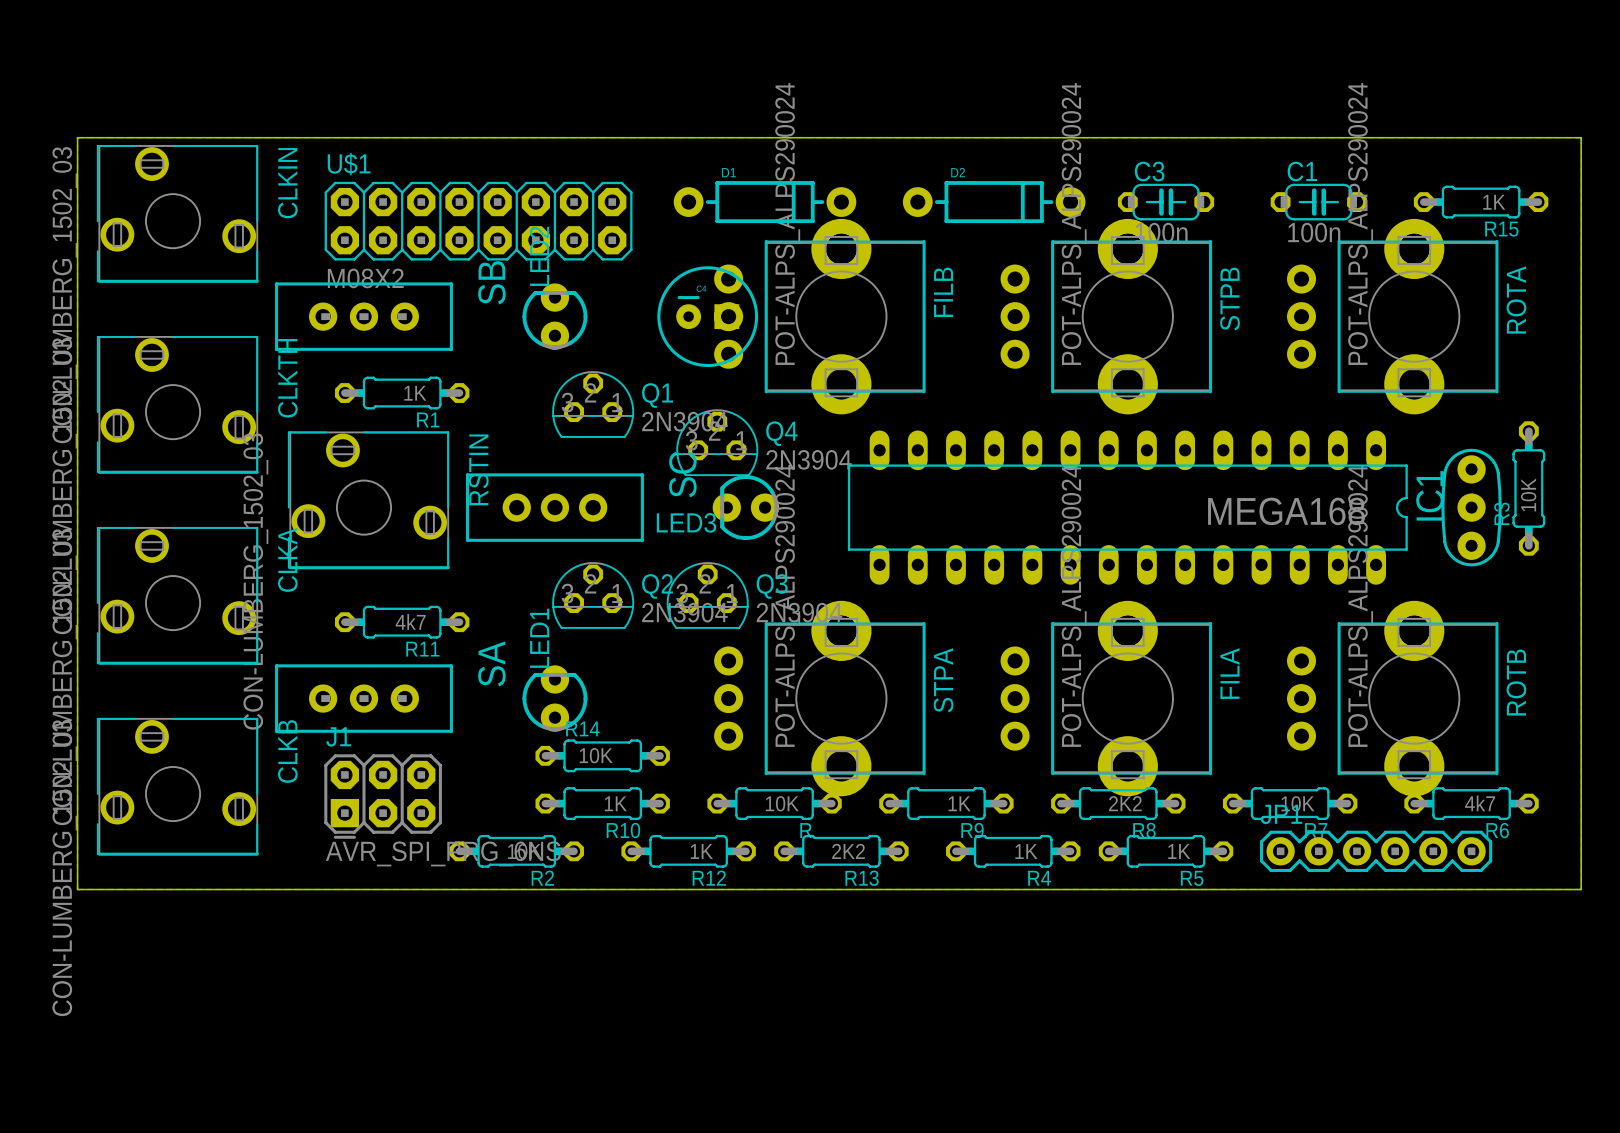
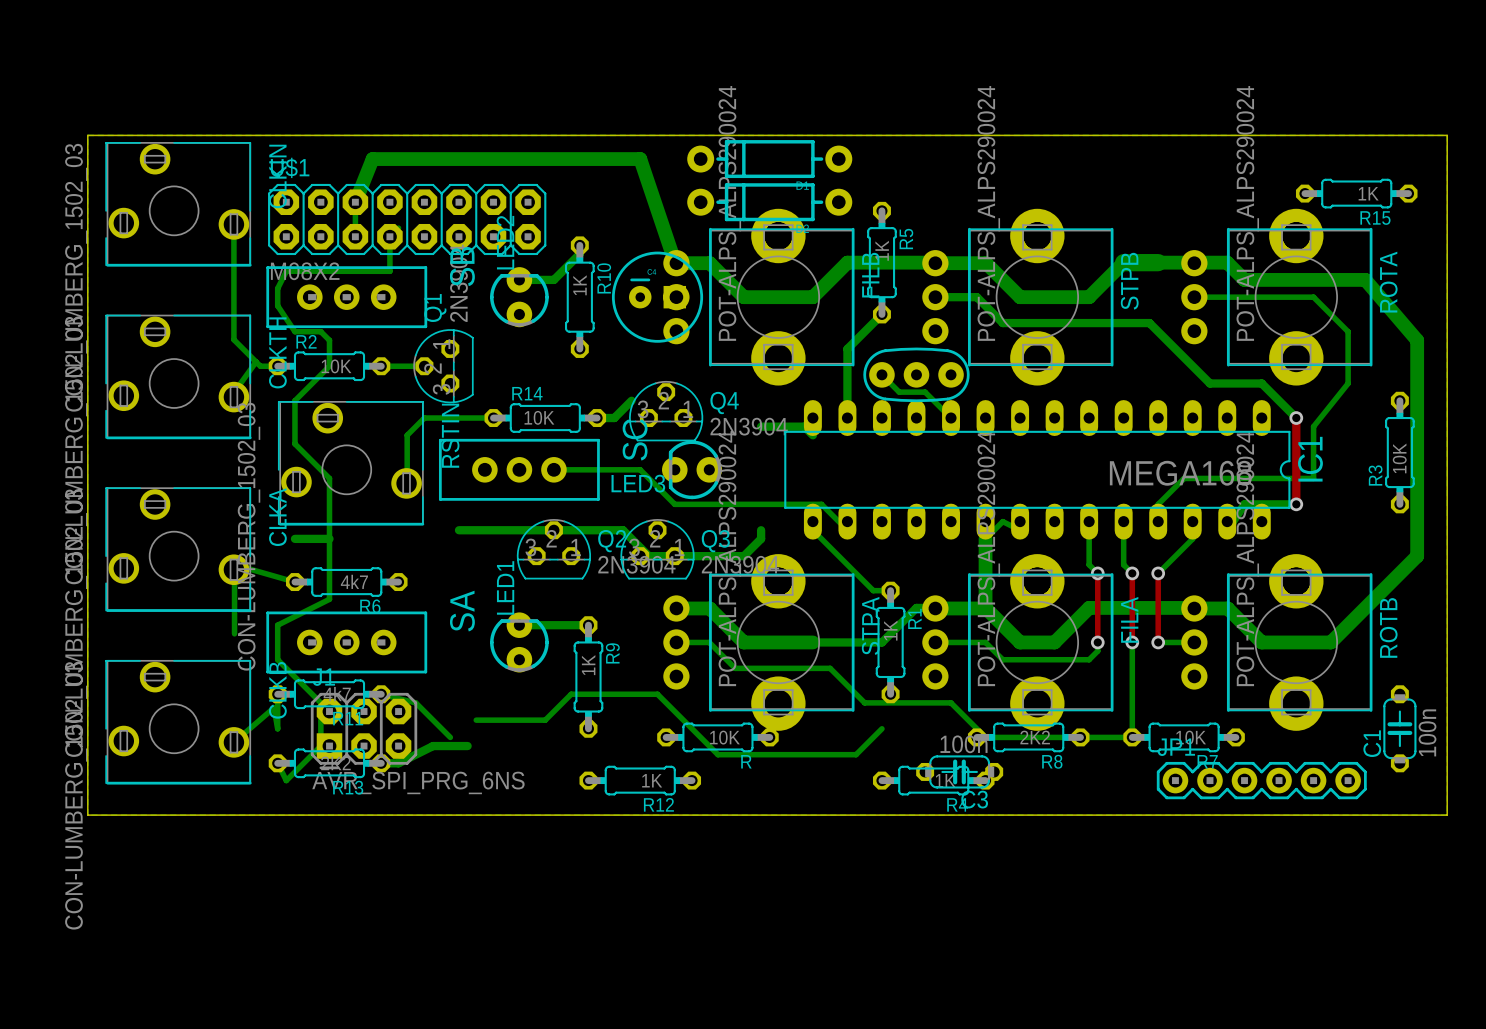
D1 rotation: 0° (765, 202) -> 180° (769, 159)
D2 rotation: 0° (994, 202) -> 180° (769, 202)
D2 position: (994, 202) -> (769, 202)
C3 rotation: 0° (1166, 202) -> 180° (959, 771)
C3 position: (1166, 202) -> (959, 771)
C1 rotation: 0° (1318, 202) -> 90° counterclockwise (1399, 728)
C1 position: (1318, 202) -> (1399, 728)
U$1 position: (478, 221) -> (407, 219)
bottom track: none -> (233, 224) (233, 339) (260, 366) (277, 366)
bottom track: none -> (398, 228) (389, 236) (389, 271) (286, 271) (277, 288) (277, 305) (294, 331) (320, 331) (329, 340) (329, 366) (294, 400) (294, 443) (329, 478) (329, 599) (277, 625) (277, 659) (320, 702) (320, 746) (286, 780) (277, 763)
bottom track: none -> (355, 236) (355, 202) (372, 159) (640, 159) (675, 263) (709, 263) (743, 297) (812, 297) (847, 262) (986, 263) (1020, 297) (1089, 297) (1123, 262) (1227, 262) (1244, 279) (1365, 279) (1417, 340) (1417, 556) (1330, 642) (1261, 642) (1227, 608) (1193, 607) (1089, 607) (1054, 642) (1020, 642) (985, 608)
bottom track: none -> (579, 245) (579, 254) (553, 279) (519, 279)
bottom track: none -> (935, 297) (976, 297) (1002, 323) (1149, 323) (1209, 383) (1261, 383) (1296, 418)
bottom track: none -> (1192, 297) (1313, 297) (1348, 331) (1348, 383) (1313, 426) (1313, 478) (1184, 478) (1158, 504) (1158, 530)
bottom track: none -> (881, 314) (847, 348) (847, 426)
bottom track: none -> (256, 361) (233, 392) (233, 397)
bottom track: none -> (381, 366) (424, 366)
R1 rotation: 0° (402, 393) -> 90° clockwise (890, 642)
R1 position: (402, 393) -> (890, 642)
bottom track: none -> (881, 374) (899, 392) (925, 392) (951, 418) (951, 426)
part: none -> (916, 374)
Q1 rotation: 0° (593, 404) -> 90° counterclockwise (443, 366)
Q1 position: (593, 404) -> (443, 366)
R1 name position: R1 (428, 419) -> R1 (914, 618)
bottom track: none -> (631, 400) (614, 418) (597, 418)
bottom track: none -> (493, 418) (424, 418) (407, 435) (406, 483)
top track: none -> (1296, 418) (1296, 504)
via: none -> (1296, 418)
bottom track: none -> (761, 426) (804, 426) (812, 435)
bottom track: none -> (553, 469) (640, 469) (674, 504) (821, 504) (847, 530)
part: (1471, 507) -> none
bottom track: none -> (1296, 504) (1244, 504) (1227, 530)
via: none -> (1296, 504)
bottom track: none -> (458, 530) (622, 530) (648, 556) (743, 556) (761, 538) (761, 530)
bottom track: none -> (812, 530) (873, 590) (890, 590)
bottom track: none -> (1020, 530) (1002, 521) (985, 538)
bottom track: none -> (1089, 530) (1089, 564) (1097, 573)
bottom track: none -> (1123, 530) (1123, 564) (1132, 573)
bottom track: none -> (1192, 530) (1192, 538) (1158, 573)
bottom track: none -> (294, 538) (329, 538)
bottom track: none -> (985, 538) (985, 608)
bottom track: none -> (233, 569) (234, 633)
bottom track: none -> (234, 573) (225, 573) (234, 564) (294, 582)
R11 position: (402, 622) -> (329, 694)
top track: none -> (1097, 573) (1097, 642)
via: none -> (1097, 573)
top track: none -> (1132, 573) (1132, 642)
via: none -> (1132, 573)
top track: none -> (1158, 573) (1158, 642)
via: none -> (1158, 573)
bottom track: none -> (676, 608) (709, 608) (743, 642) (881, 642) (916, 607) (985, 608)
bottom track: none -> (519, 625) (588, 625)
bottom track: none -> (676, 642) (709, 642) (735, 668) (830, 668) (864, 702) (951, 702) (985, 737) (1132, 737) (1132, 642)
bottom track: none -> (935, 642) (985, 642) (1002, 659) (1089, 659) (1097, 651) (1097, 642)
via: none -> (1097, 642)
via: none -> (1132, 642)
bottom track: none -> (1158, 642) (1194, 642)
via: none -> (1158, 642)
bottom track: none -> (277, 694) (277, 728) (274, 707) (233, 742)
bottom track: none -> (381, 694) (415, 702) (450, 737)
R14 position: (602, 755) -> (545, 418)
bottom track: none -> (476, 720) (545, 720) (571, 694) (657, 694) (717, 754) (856, 754) (881, 728)
R10 rotation: 0° (602, 803) -> 90° clockwise (579, 297)
R10 position: (602, 803) -> (579, 297)
R9 rotation: 0° (946, 803) -> 90° clockwise (588, 676)
R9 position: (946, 803) -> (588, 676)
R6 position: (1471, 803) -> (346, 582)
bottom track: none -> (467, 746) (433, 746) (398, 763) (381, 763)
R10 name position: R10 (623, 830) -> R10 (604, 278)
R9 name position: R9 (972, 830) -> R9 (612, 653)
R2 position: (516, 851) -> (329, 366)
R13 position: (841, 851) -> (329, 763)
R5 rotation: 0° (1166, 851) -> 90° clockwise (881, 262)
R5 position: (1166, 851) -> (881, 262)
R2 name position: R2 (542, 878) -> R2 (306, 341)
R5 name position: R5 (1192, 878) -> R5 (906, 239)

